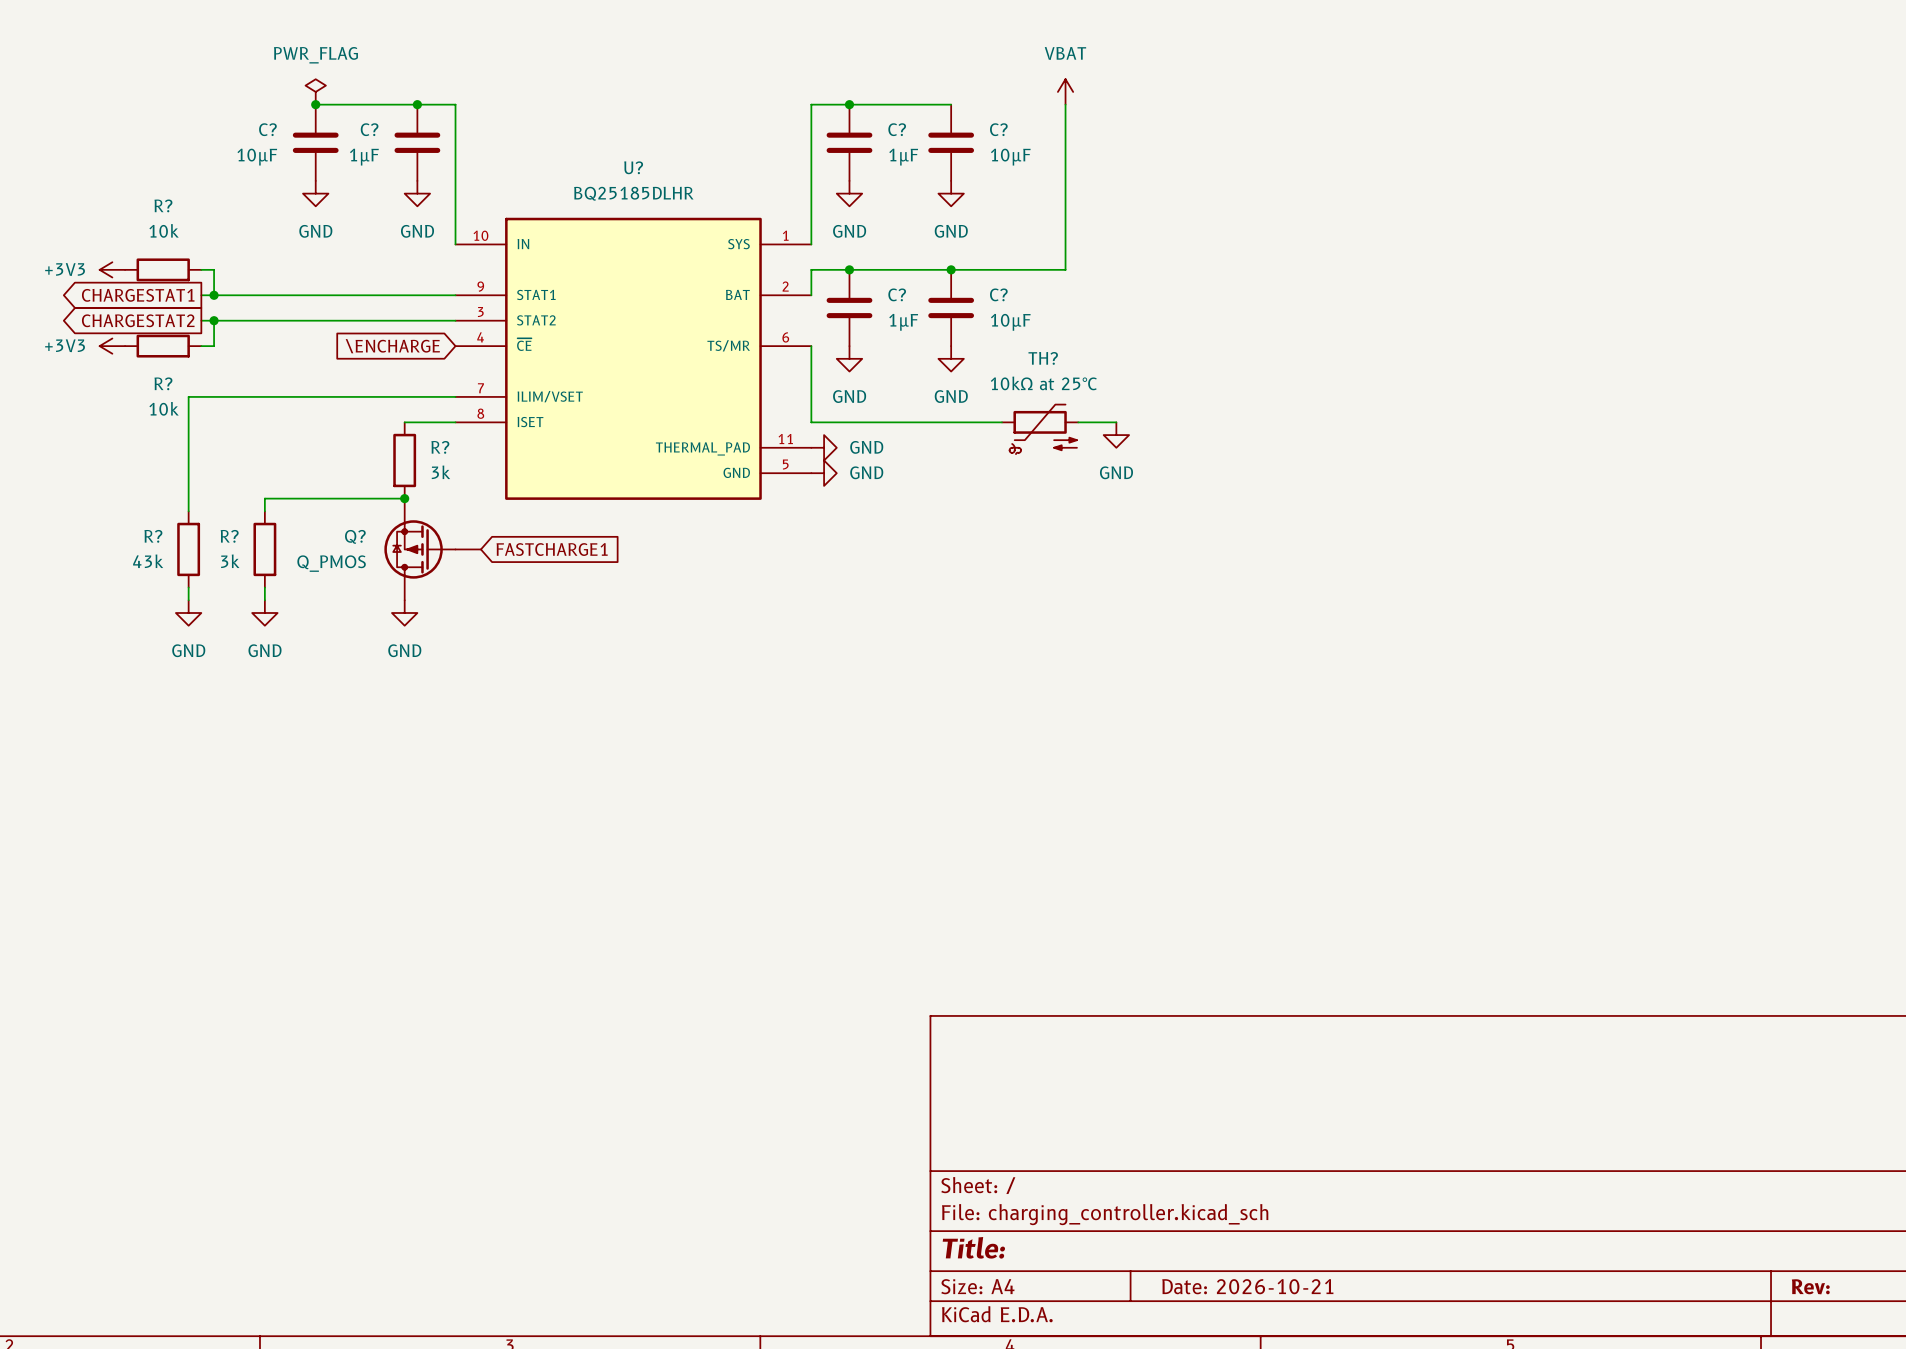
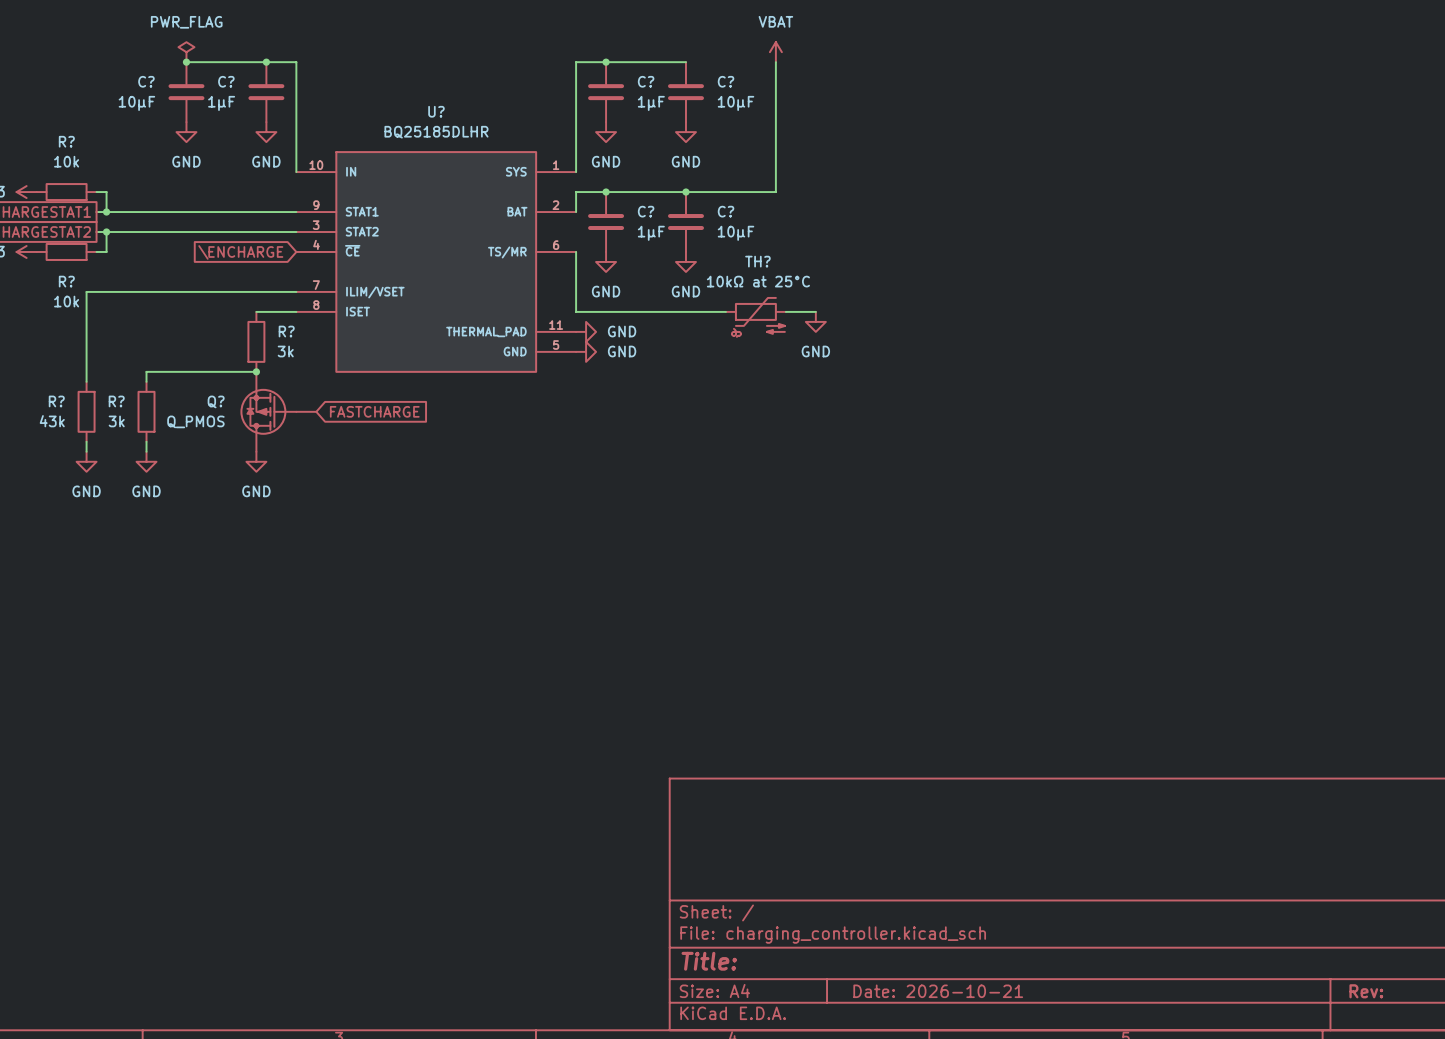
global label: FASTCHARGE1 (552, 549) -> FASTCHARGE (374, 411)

